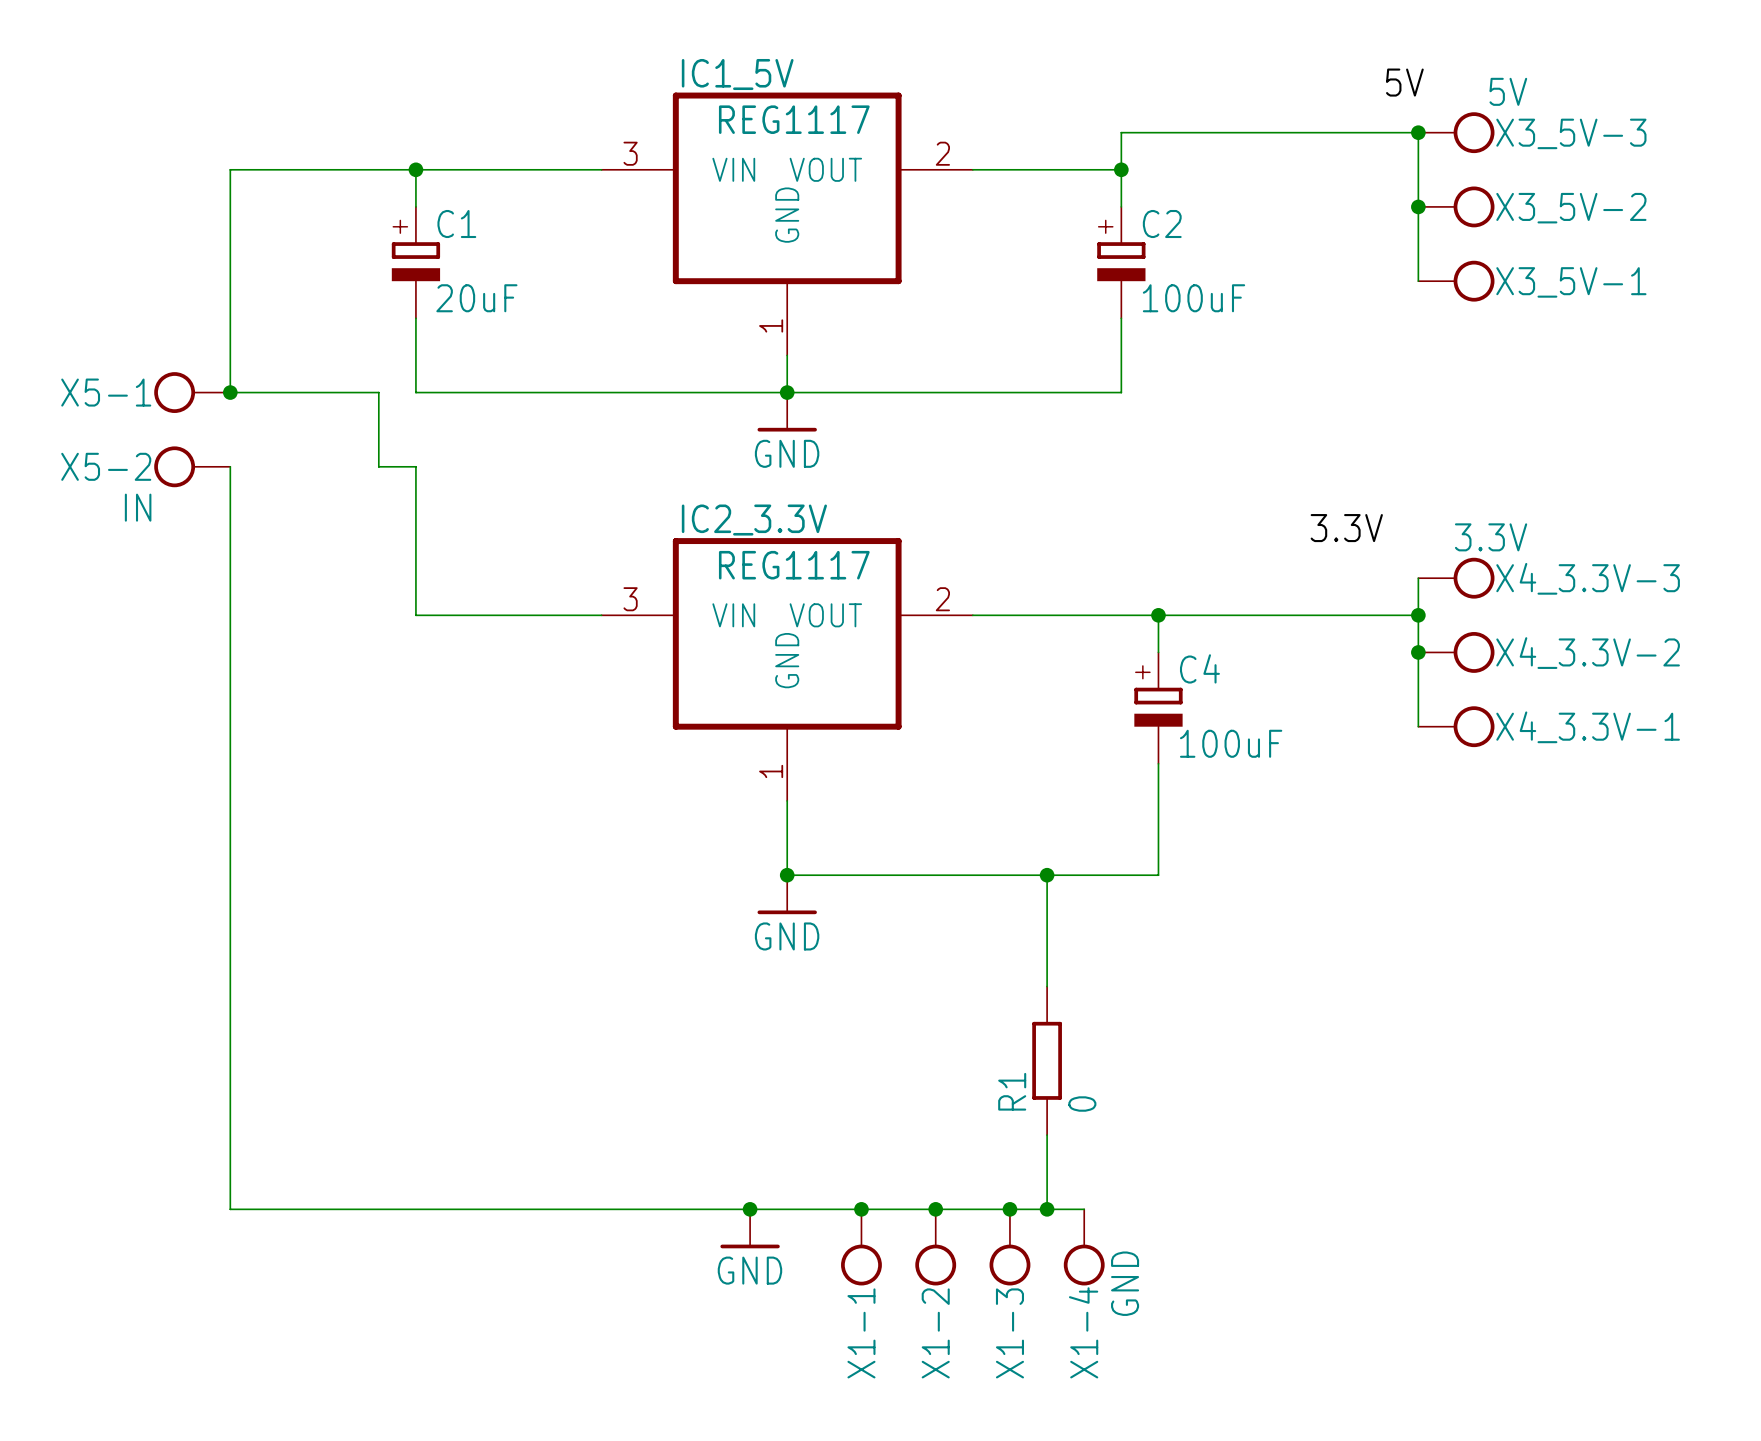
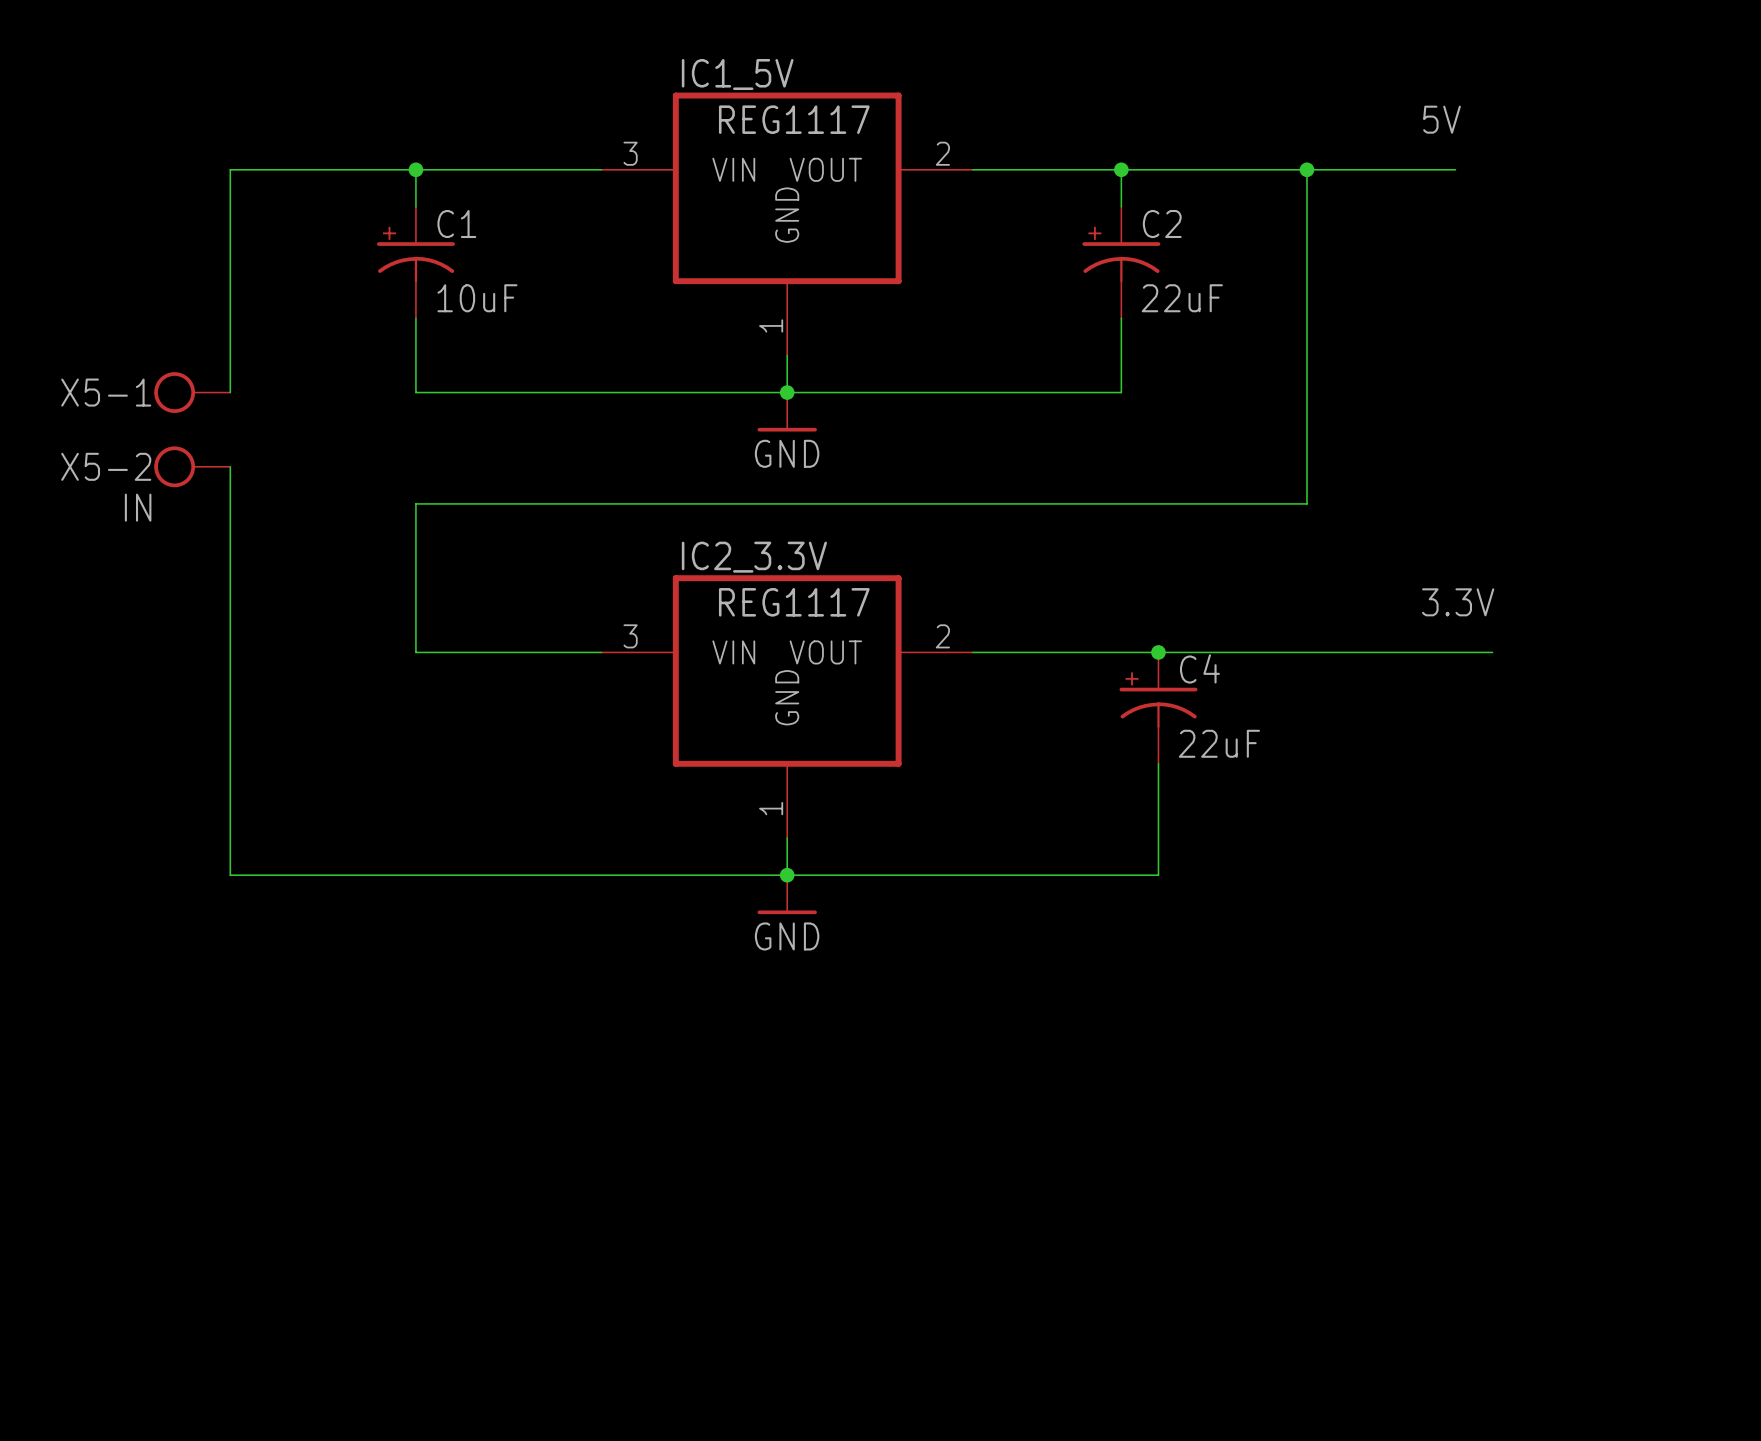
label position: 5V (1404, 82) -> 5V (1442, 119)
junction: (1418, 132) -> none
X3_5V-3: 5V (1456, 132) -> none
wire: (1121, 169) (1121, 132) (1418, 132) (1418, 281) -> (1121, 169) (1455, 169)
junction: none -> (1306, 169)
C1 symbol: [391, 206, 441, 319] -> [376, 206, 455, 319]
C2 symbol: [1097, 206, 1146, 319] -> [1082, 206, 1161, 319]
junction: (1418, 206) -> none
X3_5V-2: (1456, 206) -> none
X3_5V-1: (1456, 281) -> none
C1 value: 20uF (476, 298) -> 10uF (477, 298)
C2 value: 100uF (1194, 298) -> 22uF (1182, 298)
wire: (230, 392) (378, 392) (378, 466) (415, 466) (415, 503) -> (1306, 169) (1306, 503) (415, 503)
junction: (230, 392) -> none
label position: 3.3V (1346, 528) -> 3.3V (1458, 602)
wire: (1418, 578) (1418, 726) -> none
X4_3.3V-3: 3.3V (1456, 578) -> none
wire: (415, 615) (601, 615) -> (415, 615) (415, 652) (601, 652)
wire: (972, 615) (1418, 615) -> none
wire: (1158, 615) (1158, 652) -> none
junction position: (1158, 615) -> (1158, 652)
junction: (1418, 615) -> none
wire: none -> (972, 652) (1492, 652)
C4 symbol: [1134, 652, 1183, 764] -> [1119, 652, 1198, 764]
junction: (1418, 652) -> none
X4_3.3V-2: (1456, 652) -> none
IC2_3.3V position: (787, 669) -> (787, 706)
X4_3.3V-1: (1456, 726) -> none
C4 value: 100uF (1231, 743) -> 22uF (1219, 743)
wire: (230, 875) (230, 1209) (1084, 1209) -> (230, 875) (787, 875)
wire: (1047, 875) (1047, 986) -> none
junction: (1047, 875) -> none
R1: 0 (1047, 1060) -> none
wire: (1047, 1135) (1047, 1209) -> none
junction: (750, 1209) -> none
junction: (861, 1209) -> none
junction: (935, 1209) -> none
junction: (1009, 1209) -> none
junction: (1047, 1209) -> none
power symbol: GND (750, 1228) -> none
X1-1: (861, 1247) -> none
X1-2: (935, 1247) -> none
X1-3: (1009, 1247) -> none
X1-4: GND (1084, 1247) -> none

